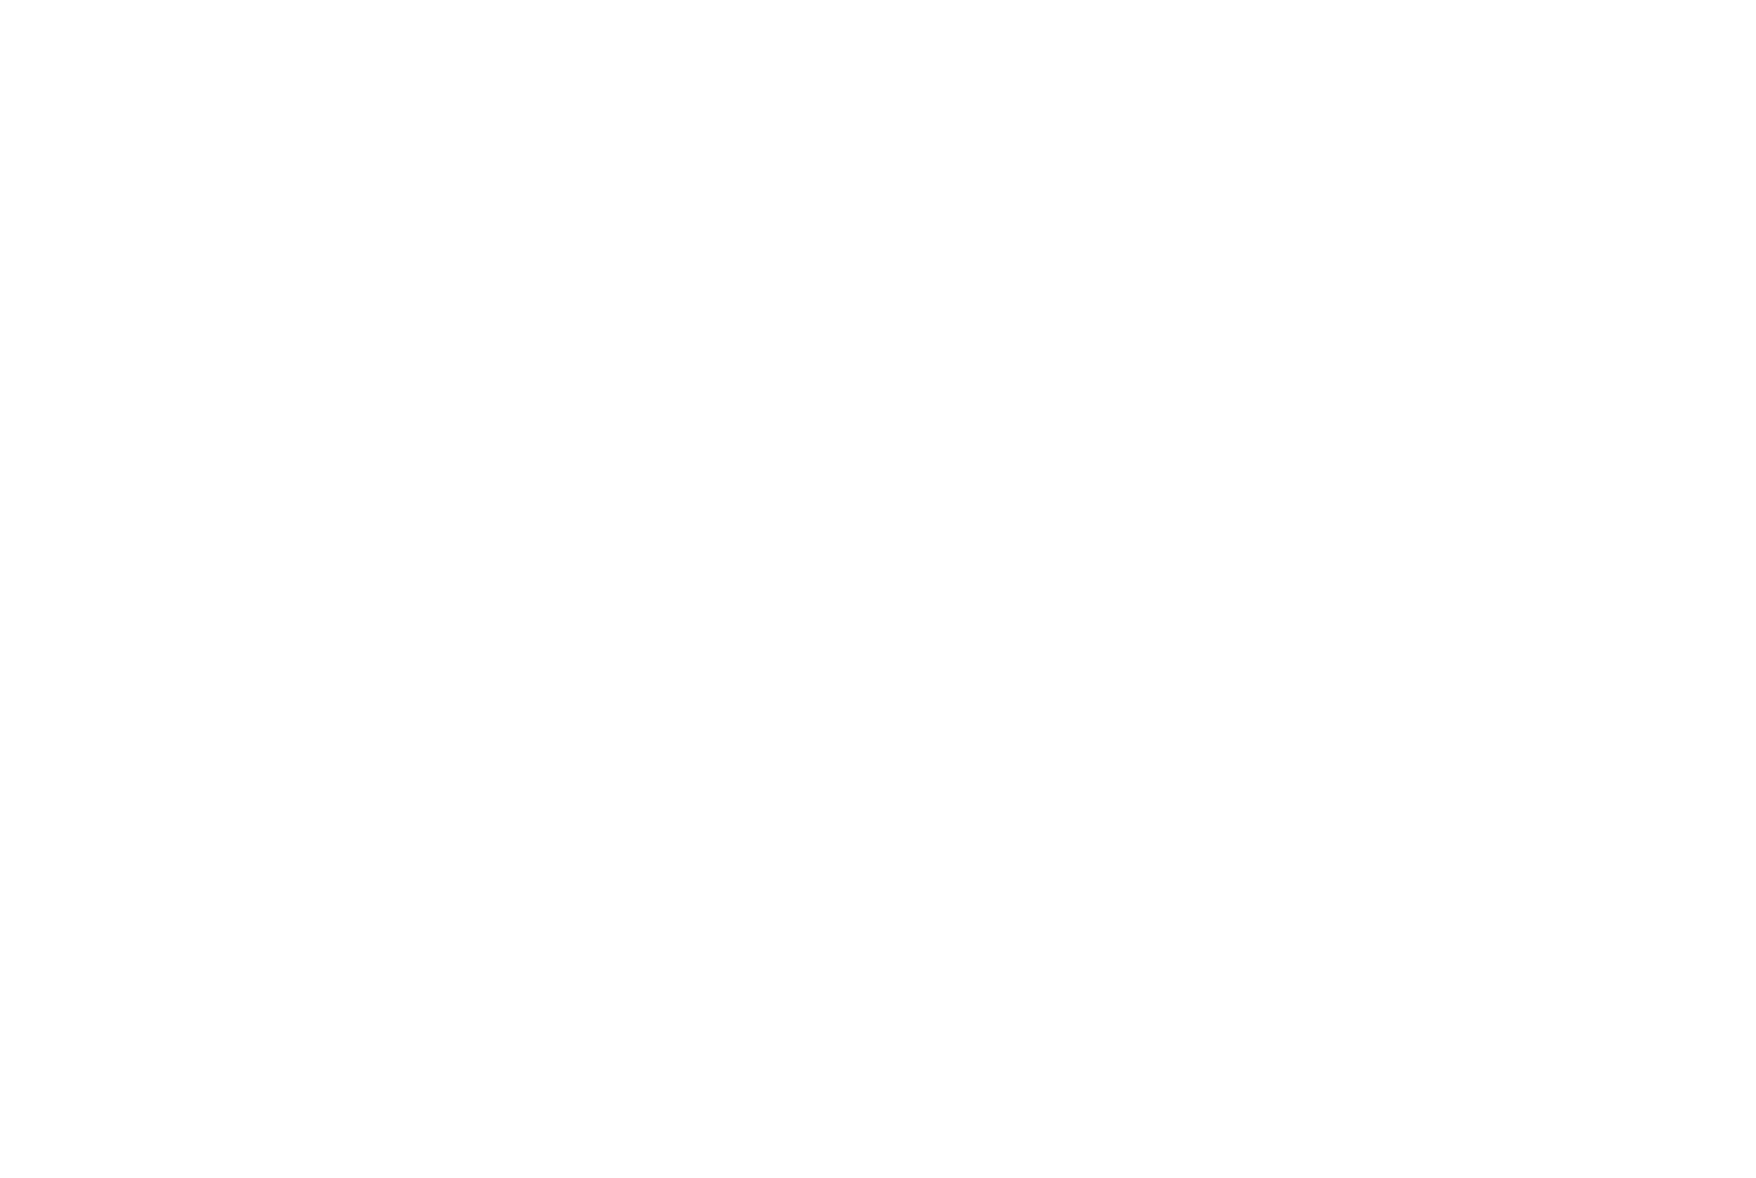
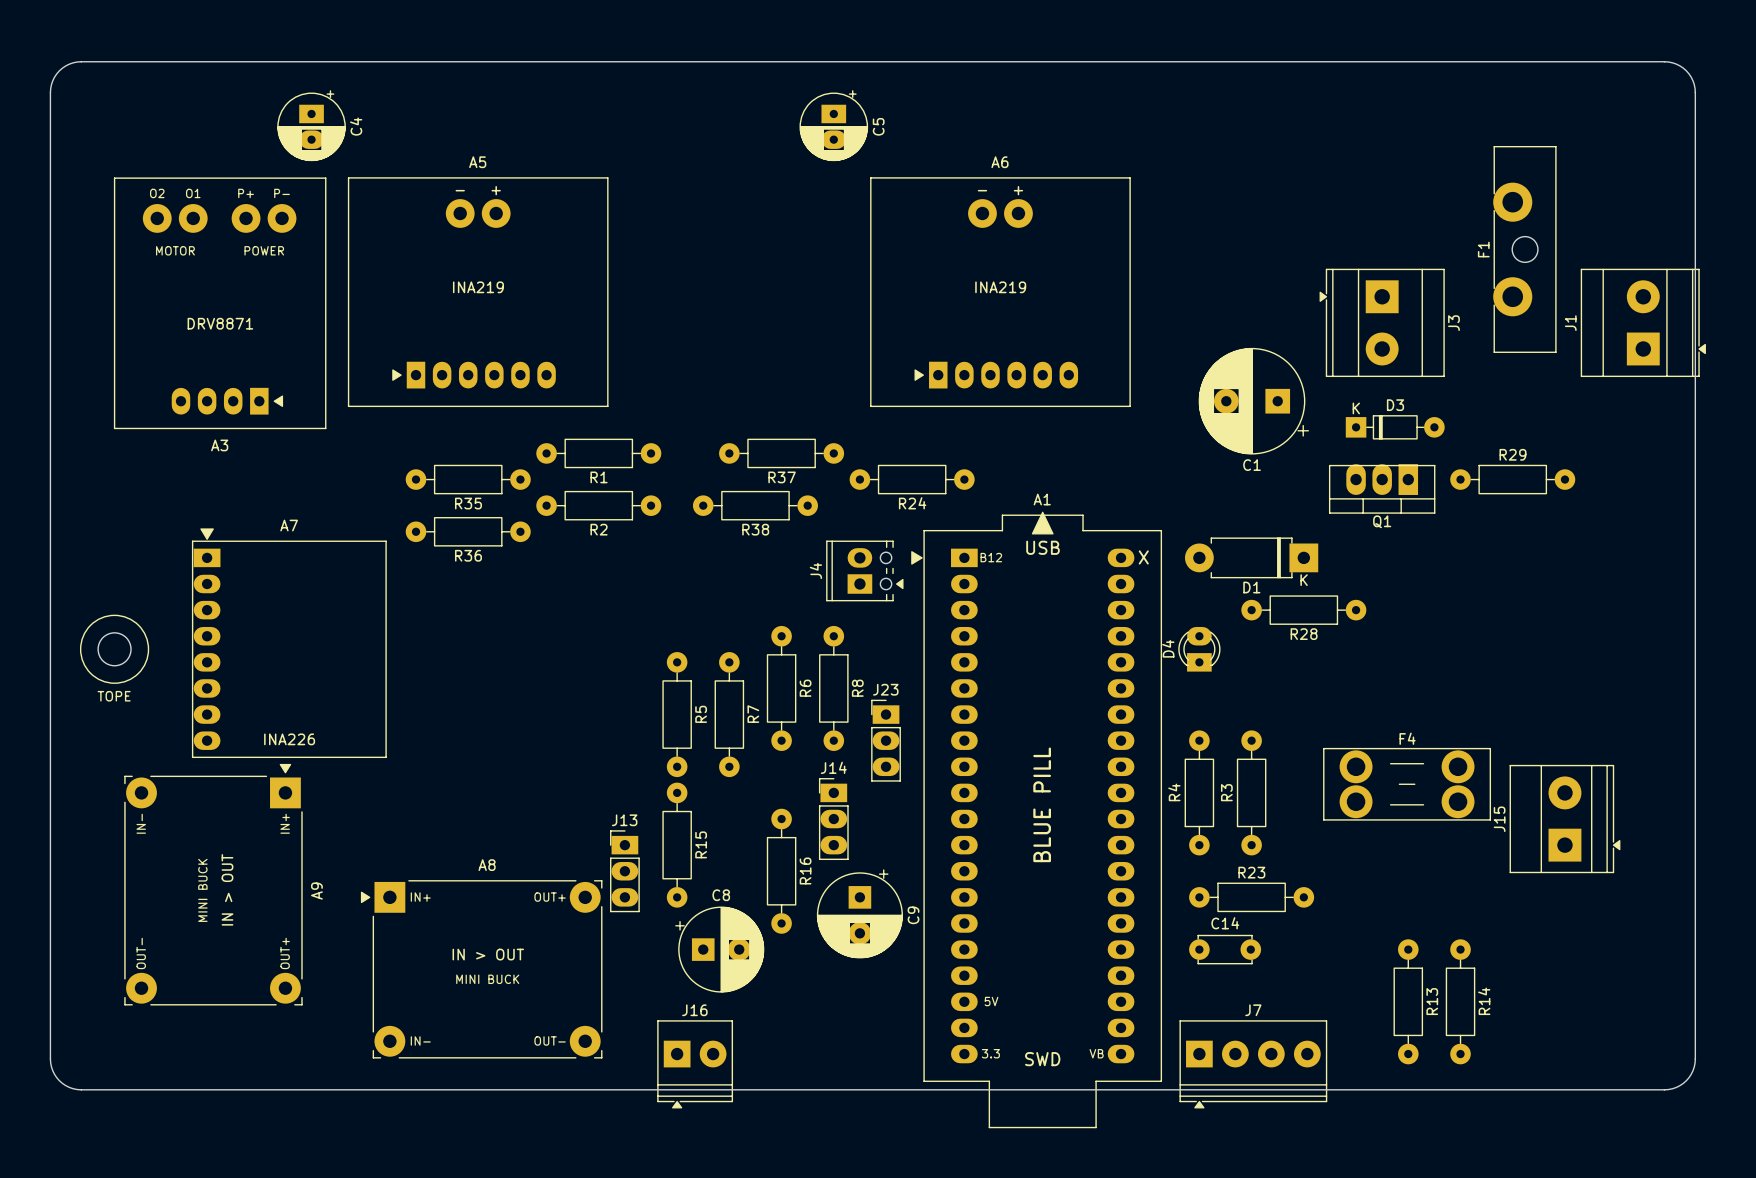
board edge: none -> (81, 61) (1664, 61) (1679, 65) (1691, 77) (1695, 92) (1695, 1058) (1691, 1074) (1679, 1085) (1664, 1089) (81, 1089) (65, 1085) (54, 1074) (50, 1058) (50, 92) (52, 80) (59, 70) (69, 64) (81, 61)
C4: none -> (311, 125)
C5: none -> (833, 125)
F1: none -> (1524, 249)
A5: none -> (478, 292)
A6: none -> (1000, 292)
A3: none -> (220, 303)
J3: none -> (1382, 322)
J1: none -> (1643, 322)
C1: none -> (1253, 401)
D3: none -> (1395, 427)
R1: none -> (598, 453)
R37: none -> (781, 453)
R35: none -> (468, 479)
R24: none -> (912, 479)
R29: none -> (1512, 479)
Q1: none -> (1382, 488)
R2: none -> (598, 505)
R38: none -> (755, 505)
R36: none -> (468, 531)
D1: none -> (1251, 557)
J4: none -> (864, 570)
R28: none -> (1303, 610)
A7: none -> (233, 643)
D4: none -> (1199, 649)
R6: none -> (781, 688)
R8: none -> (833, 688)
R5: none -> (677, 714)
R7: none -> (729, 714)
J23: none -> (886, 740)
F4: none -> (1407, 784)
R4: none -> (1199, 792)
R3: none -> (1251, 792)
J14: none -> (833, 819)
A1: none -> (1036, 819)
J15: none -> (1565, 819)
R15: none -> (677, 845)
J13: none -> (624, 871)
R16: none -> (781, 871)
A9: none -> (213, 884)
R23: none -> (1251, 897)
C9: none -> (859, 913)
C8: none -> (719, 949)
C14: none -> (1225, 949)
A8: none -> (481, 969)
R13: none -> (1408, 1001)
R14: none -> (1460, 1001)
J16: none -> (695, 1064)
J7: none -> (1253, 1064)

